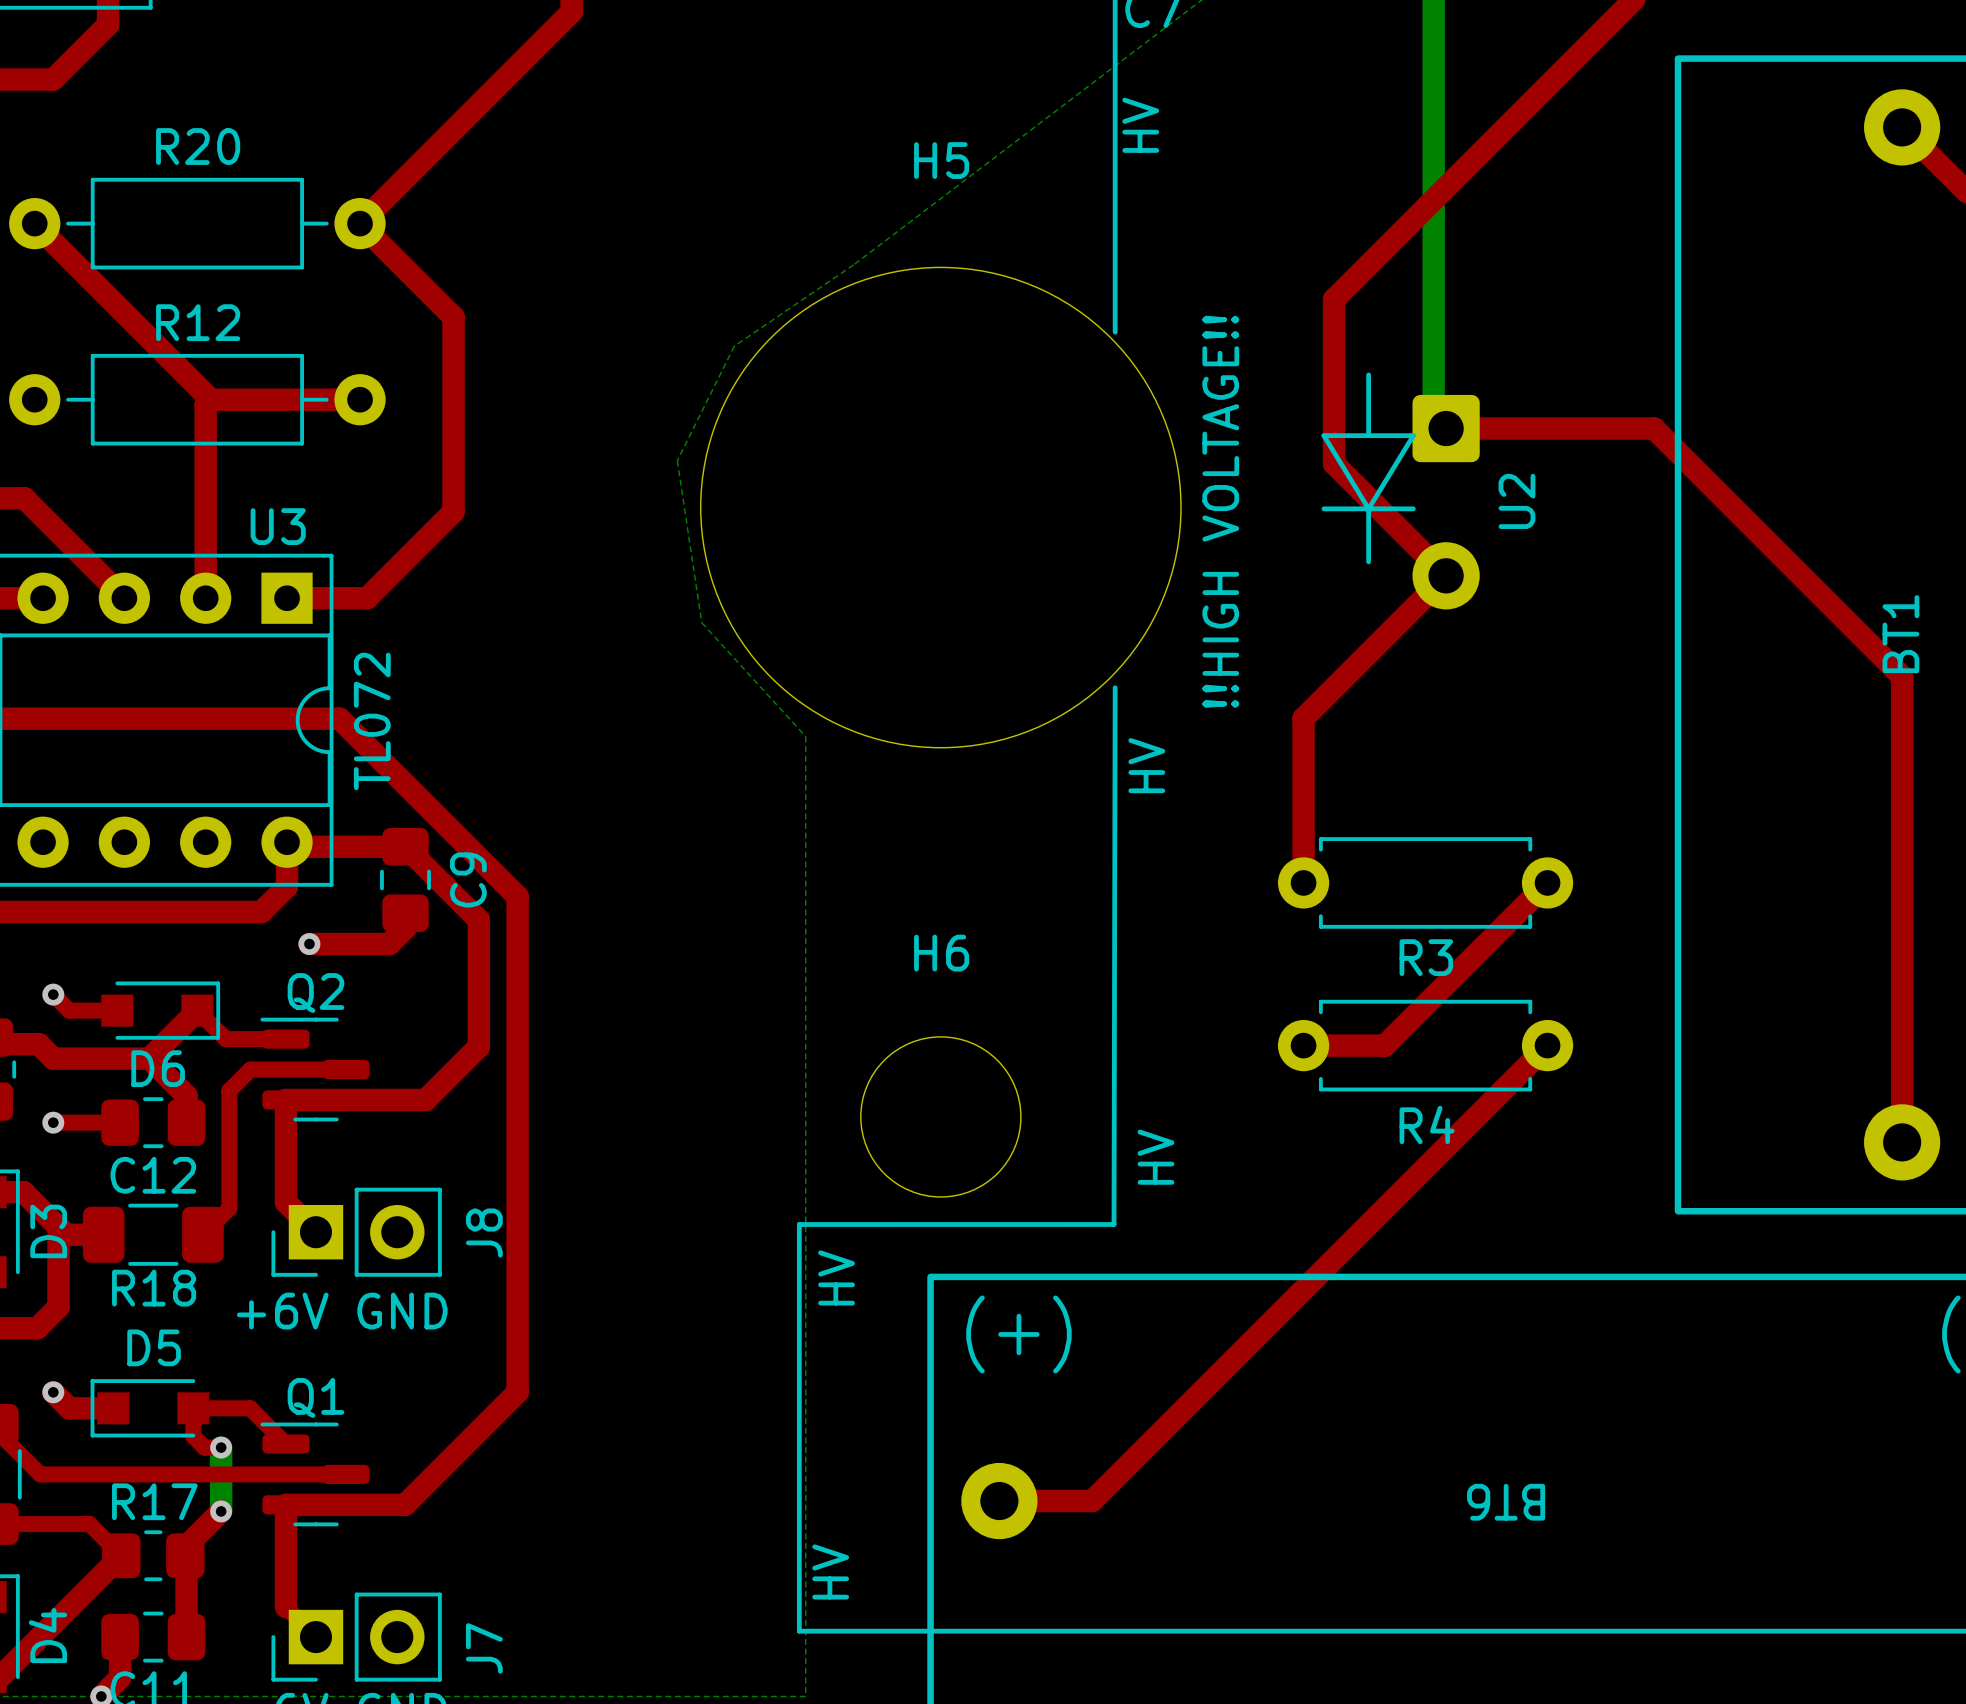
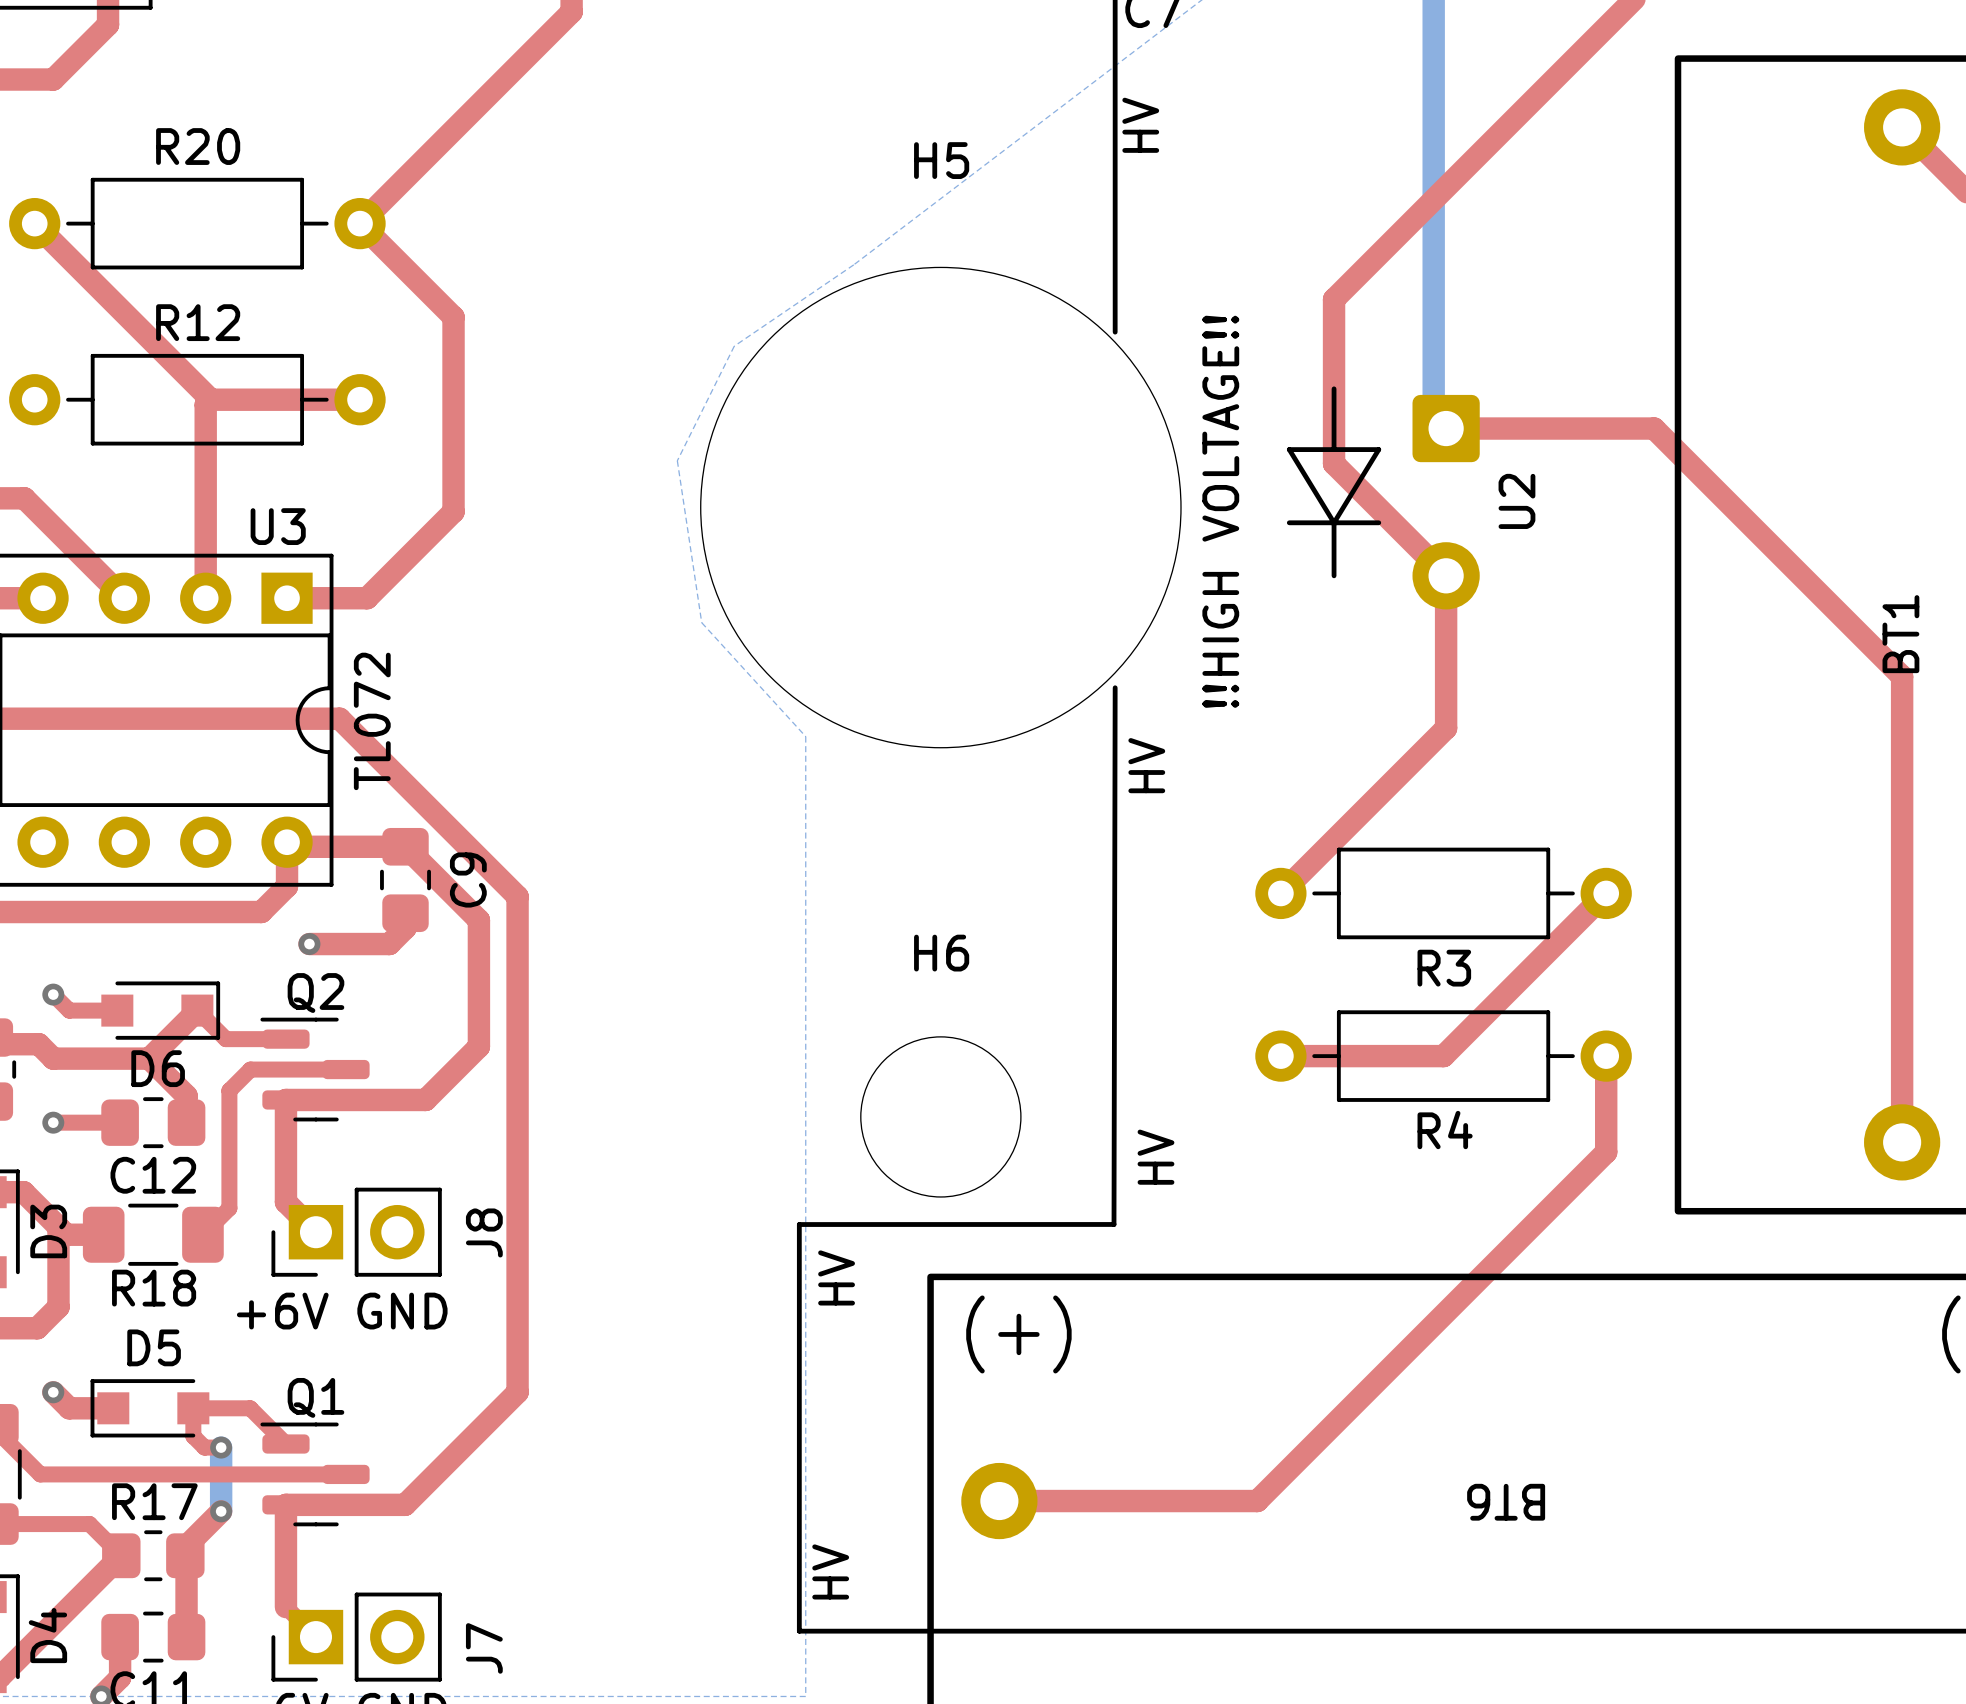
line: (1368, 374) (1368, 435) -> (1334, 388) (1334, 449)
line: (1323, 508) (1413, 508) -> (1289, 522) (1378, 522)
line: (1368, 508) (1323, 435) (1413, 435) (1368, 508) -> (1334, 522) (1289, 449) (1378, 449) (1334, 522)
line: (1368, 508) (1368, 561) -> (1334, 522) (1334, 575)
top track: (1446, 575) (1303, 718) (1303, 882) -> (1446, 575) (1446, 728) (1280, 893)
R3 footprint: [1277, 837, 1574, 929] -> [1255, 847, 1632, 940]
top track: (1547, 882) (1384, 1045) (1303, 1045) -> none
top track: none -> (1606, 893) (1443, 1056) (1280, 1056)
R4 footprint: [1277, 999, 1574, 1092] -> [1255, 1010, 1632, 1102]
top track: (1547, 1045) (1092, 1501) -> (1606, 1056) (1606, 1152) (1257, 1501) (1092, 1501)

